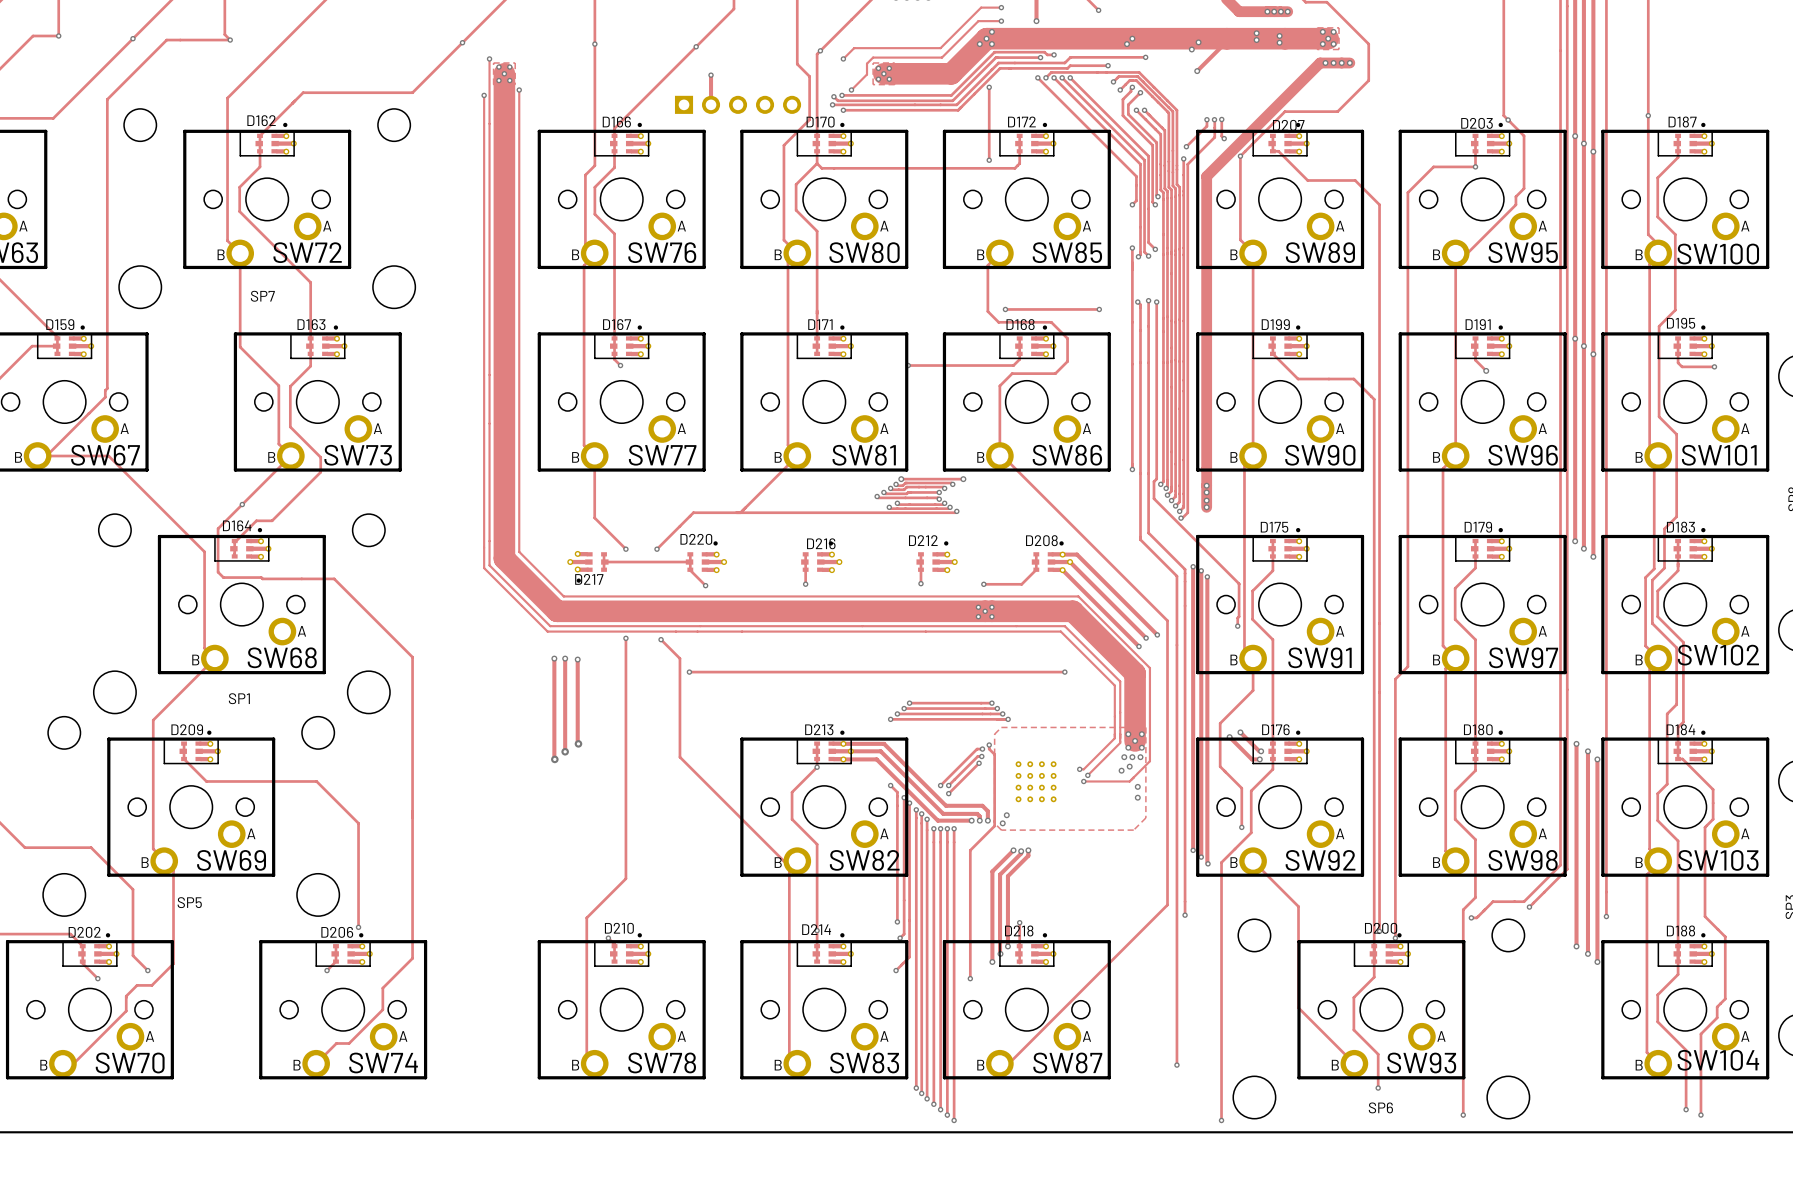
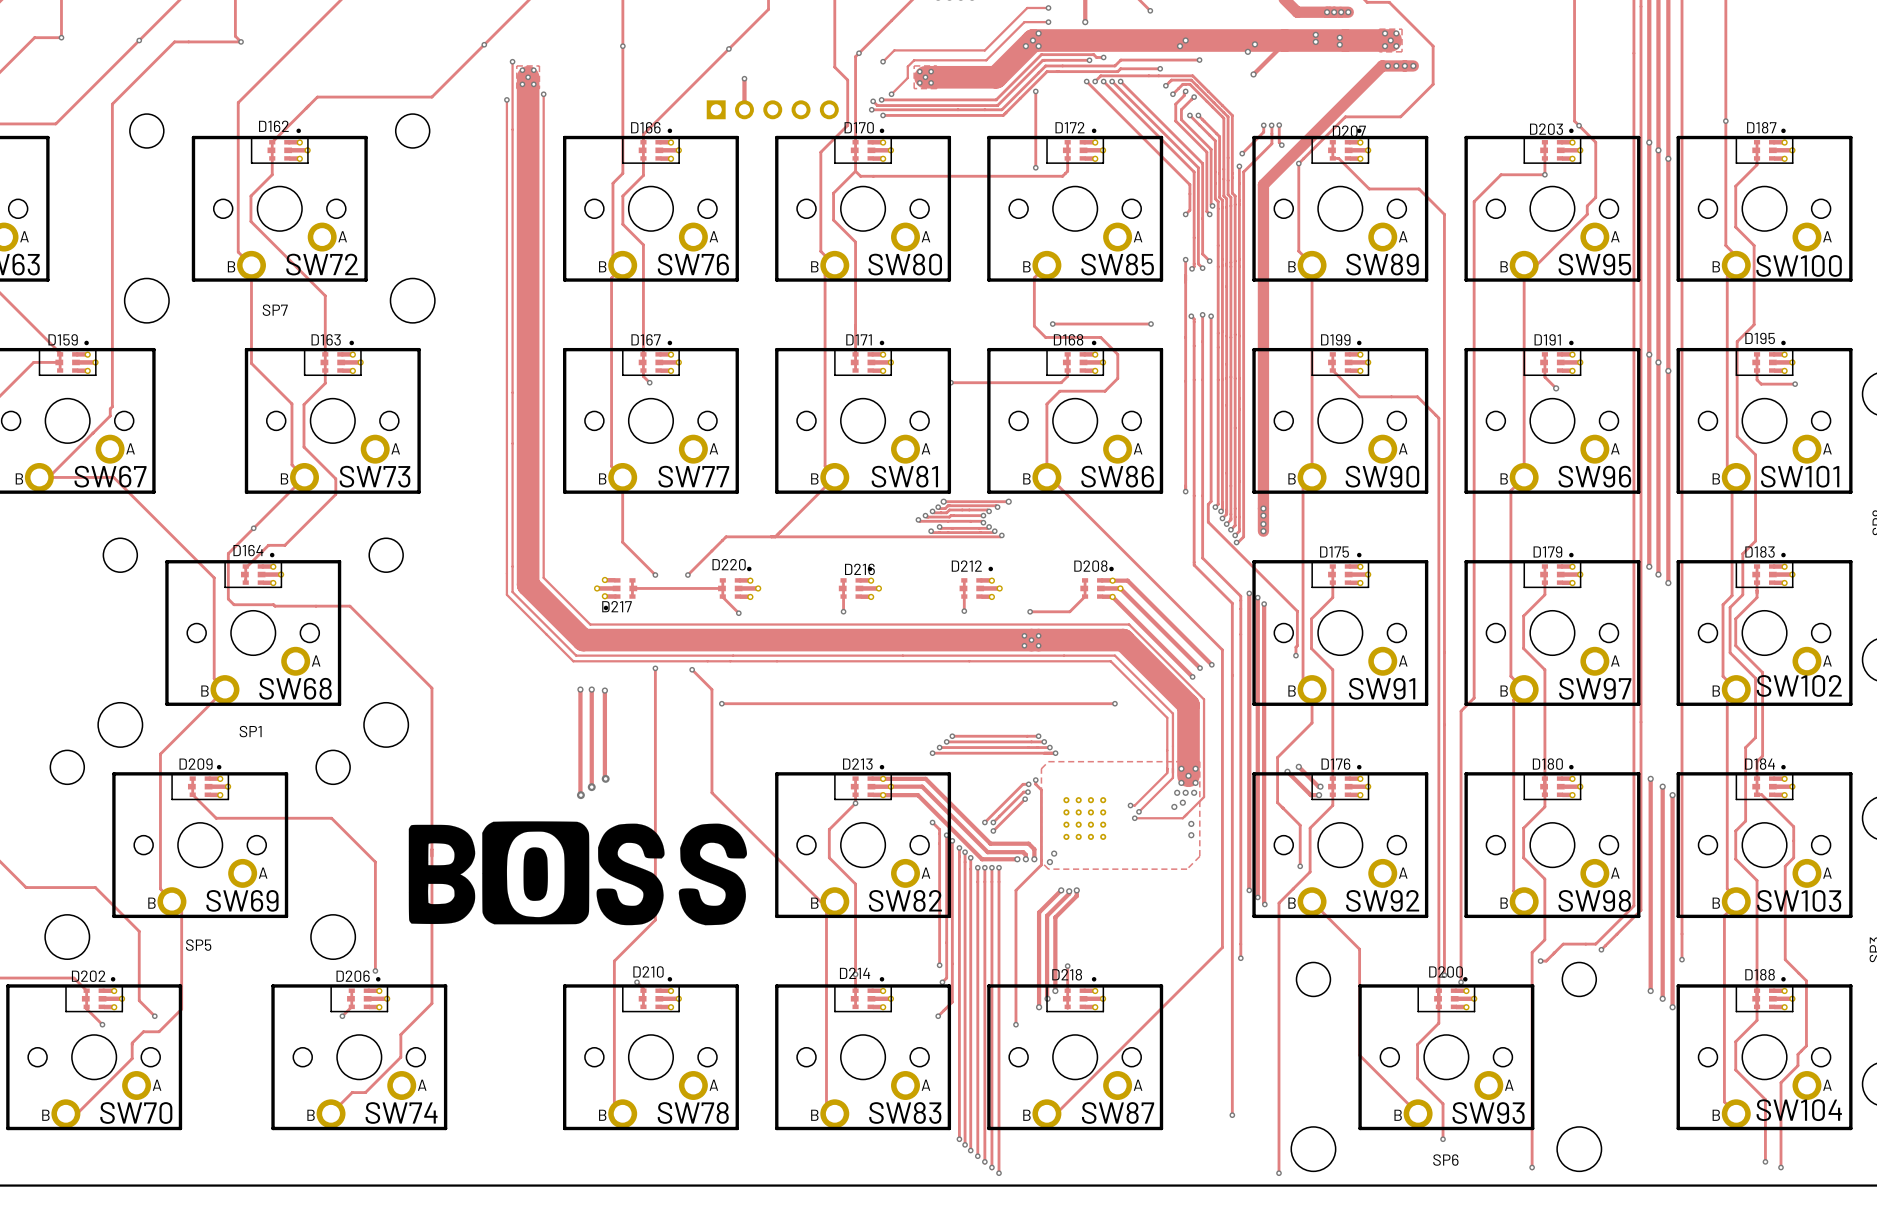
drawing: none -> [408, 821, 747, 926]

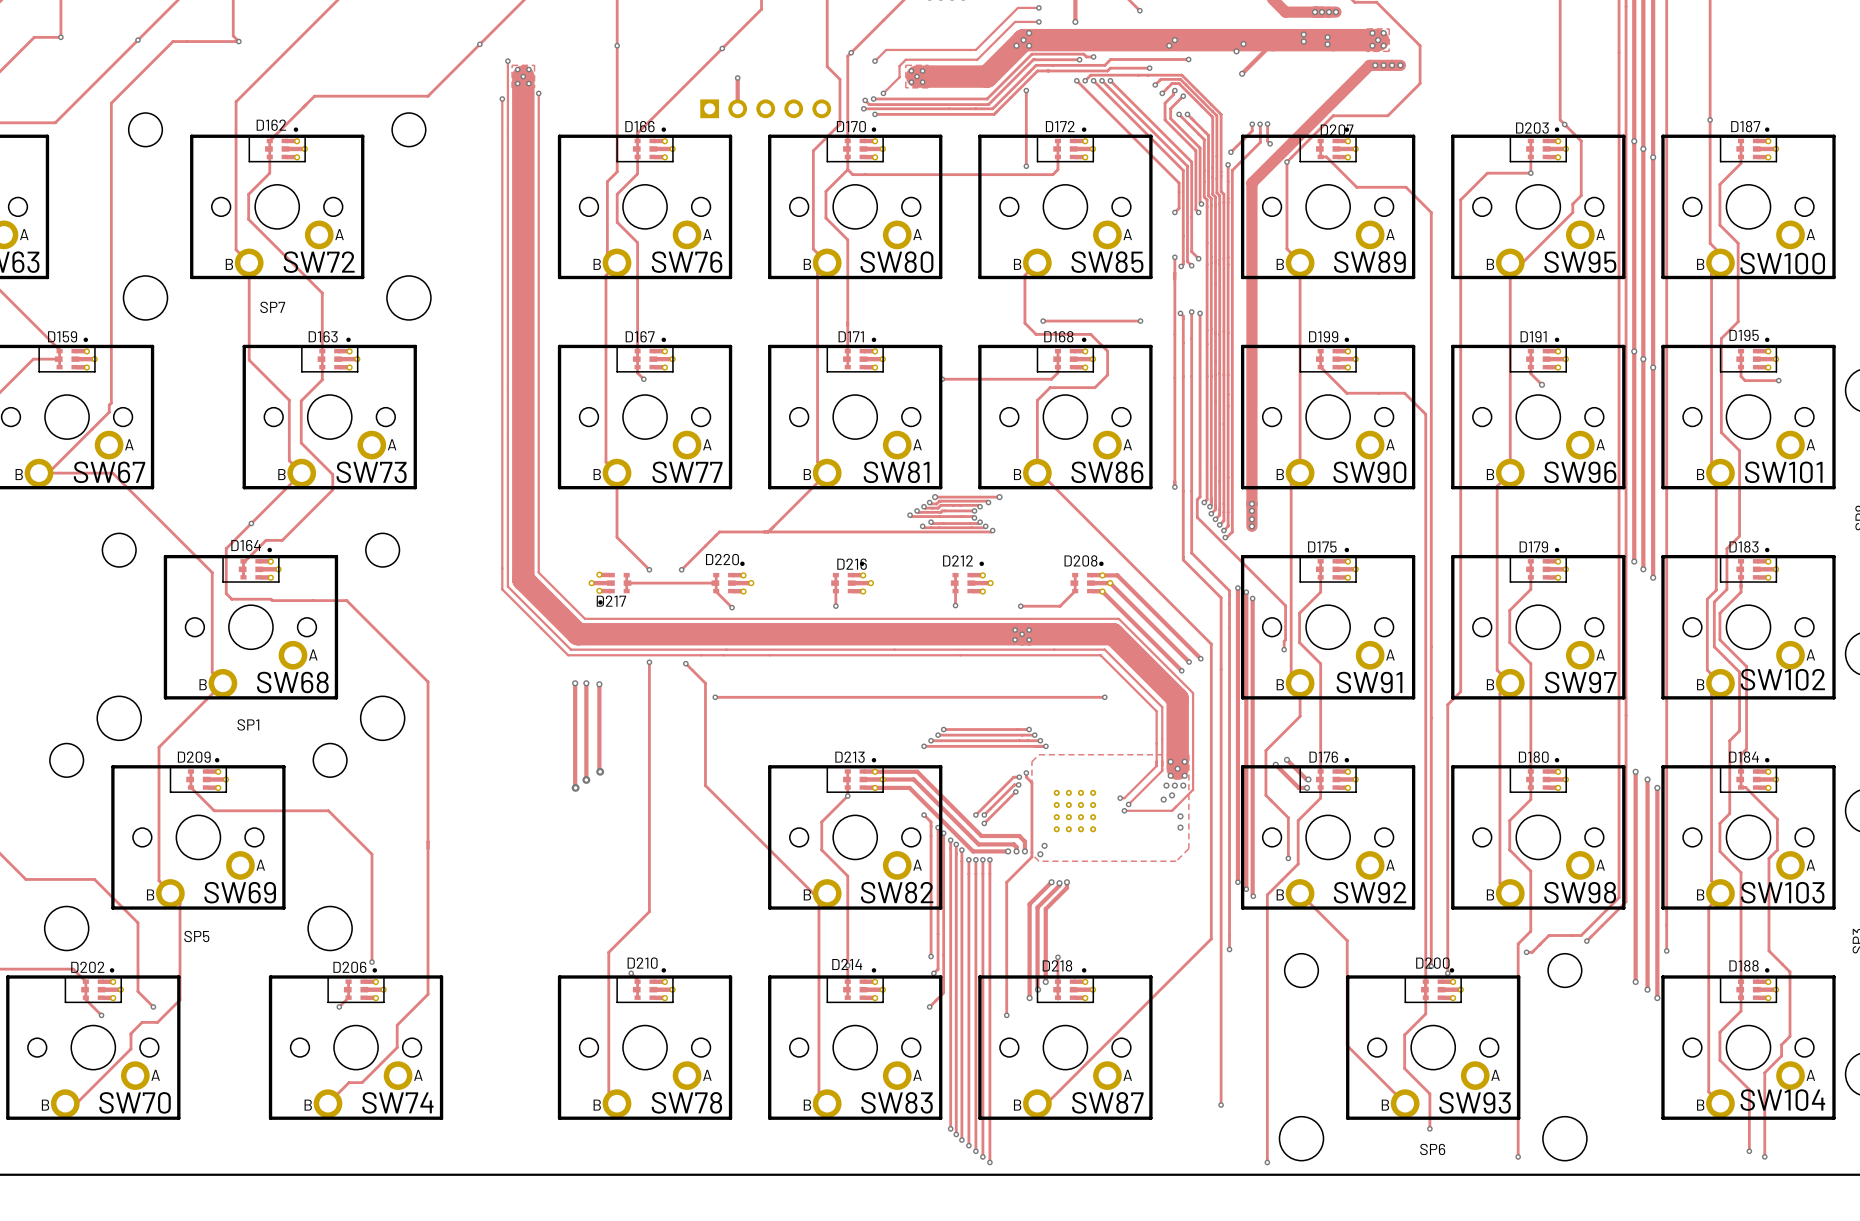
drawing: [408, 821, 747, 926] -> none

